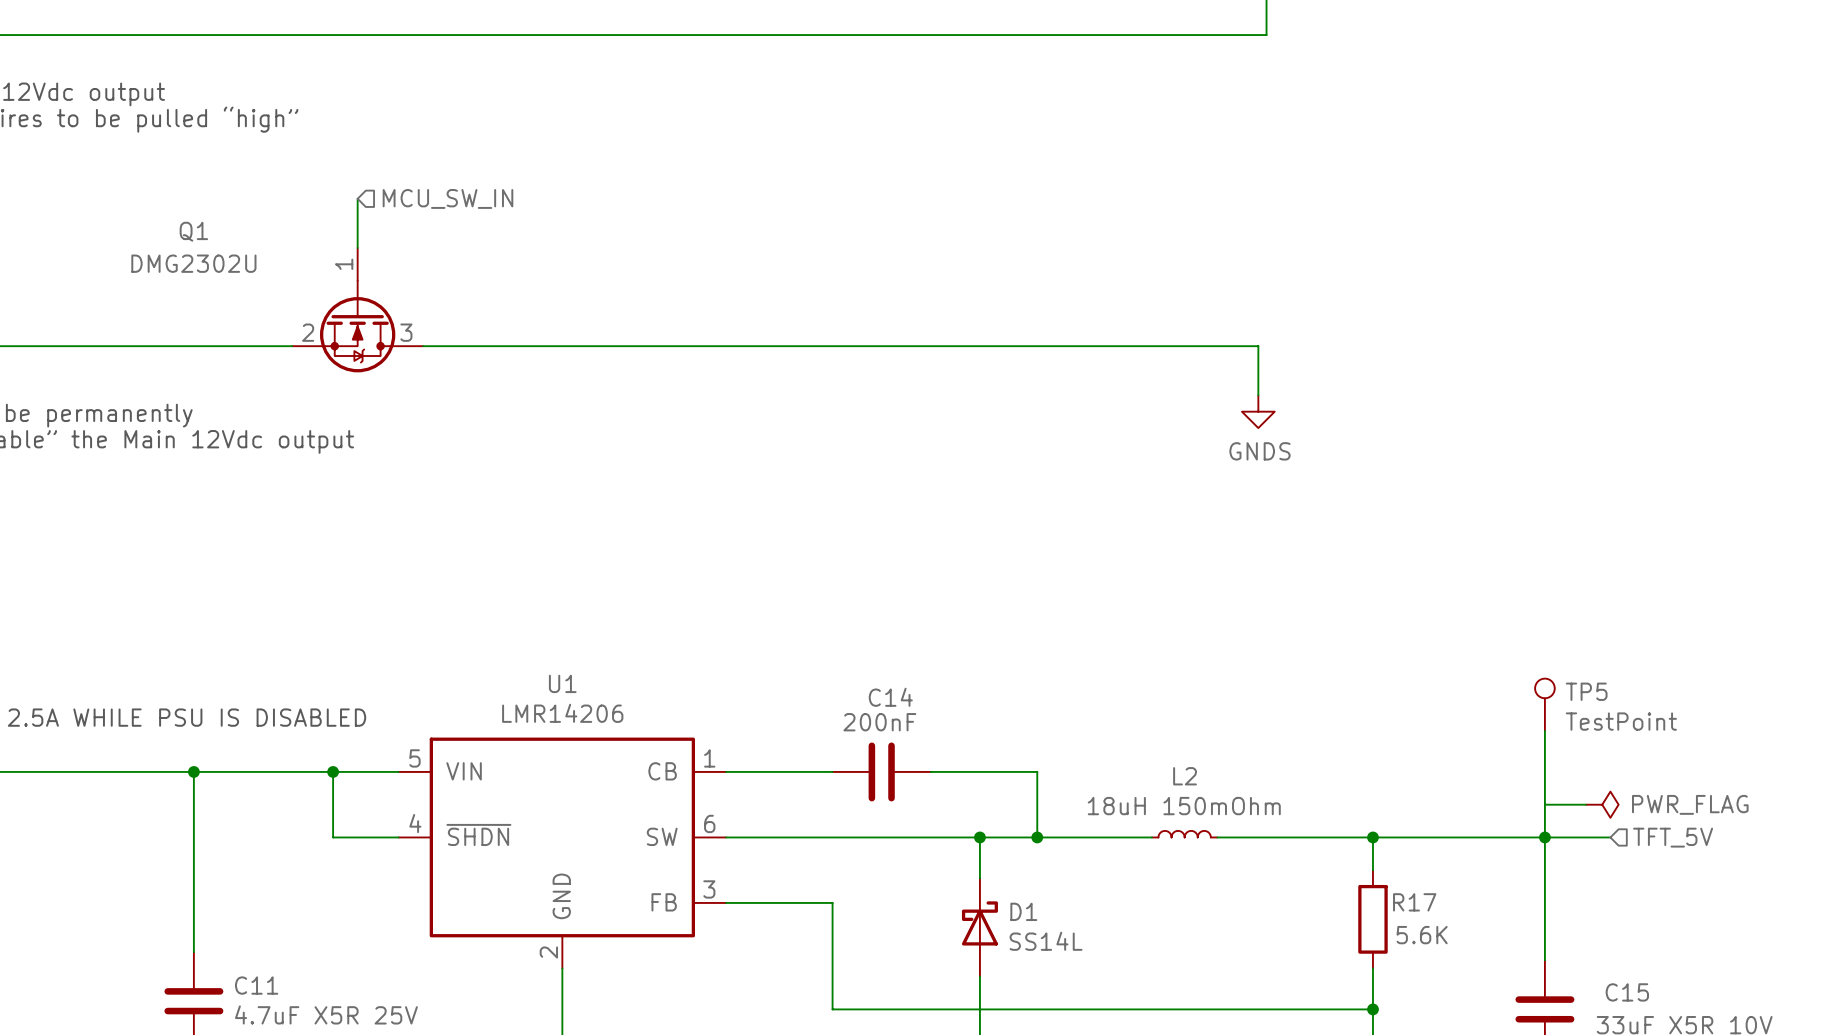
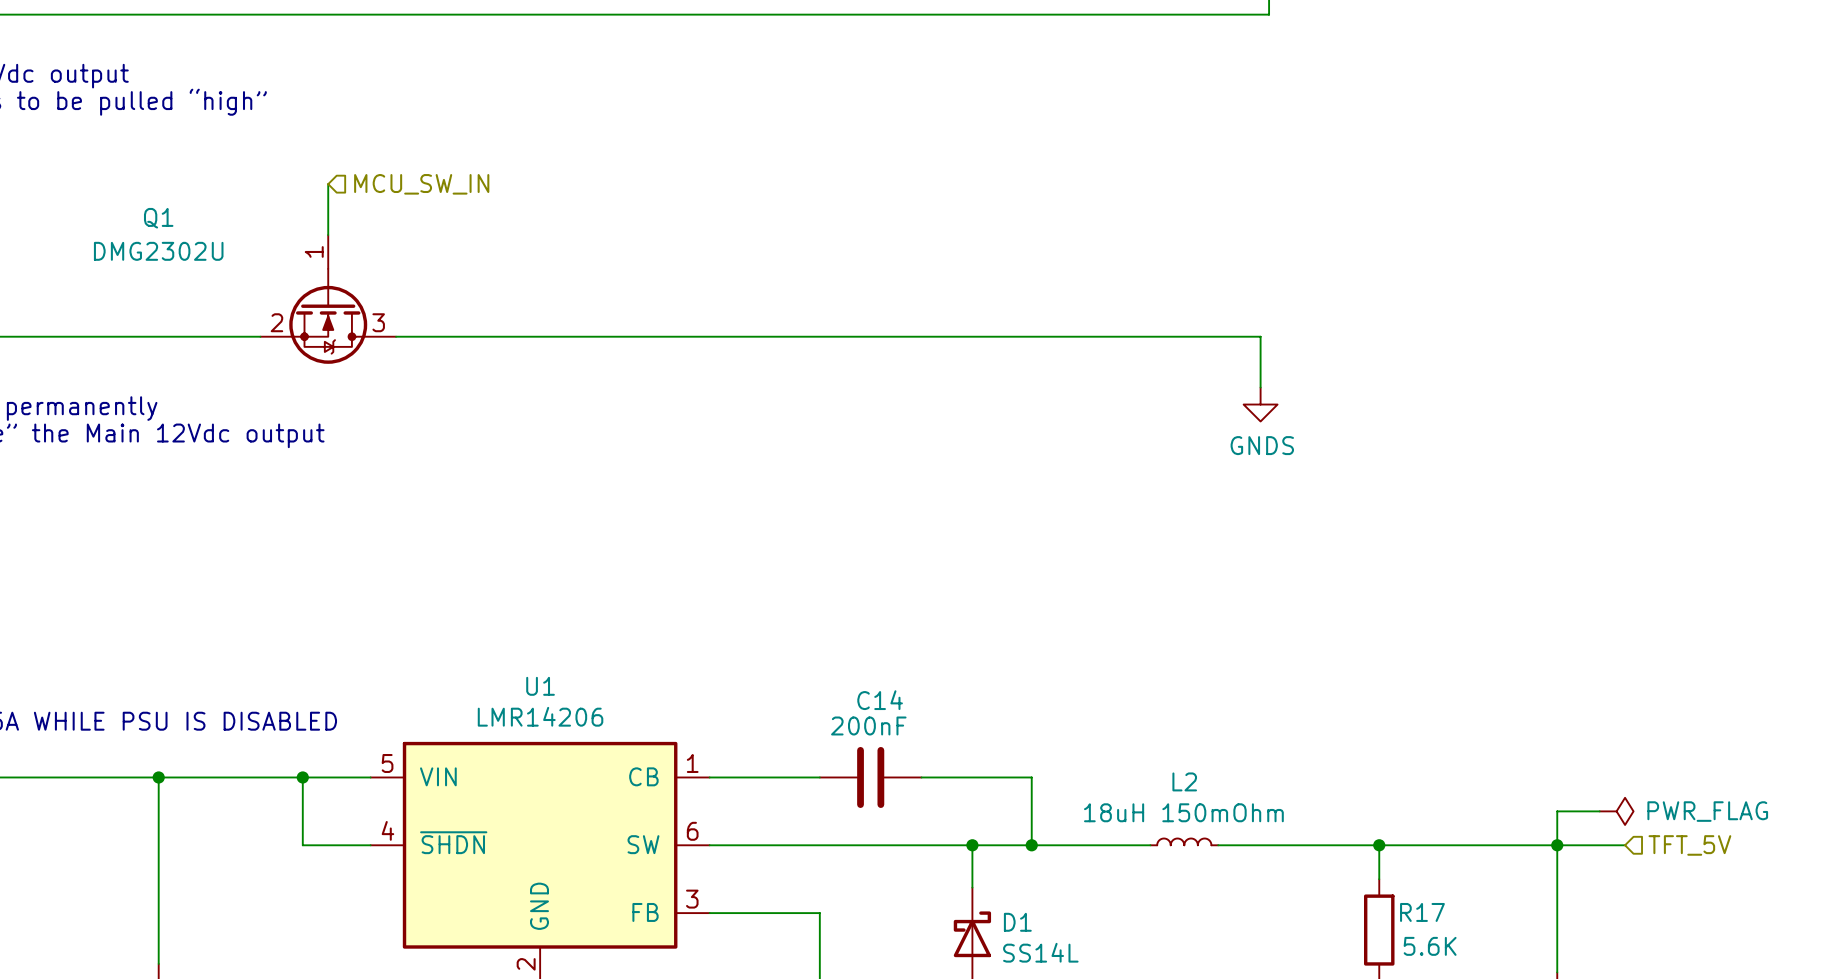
TP5: TestPoint (1544, 704) -> none
wire: (1544, 731) (1544, 804) -> none

